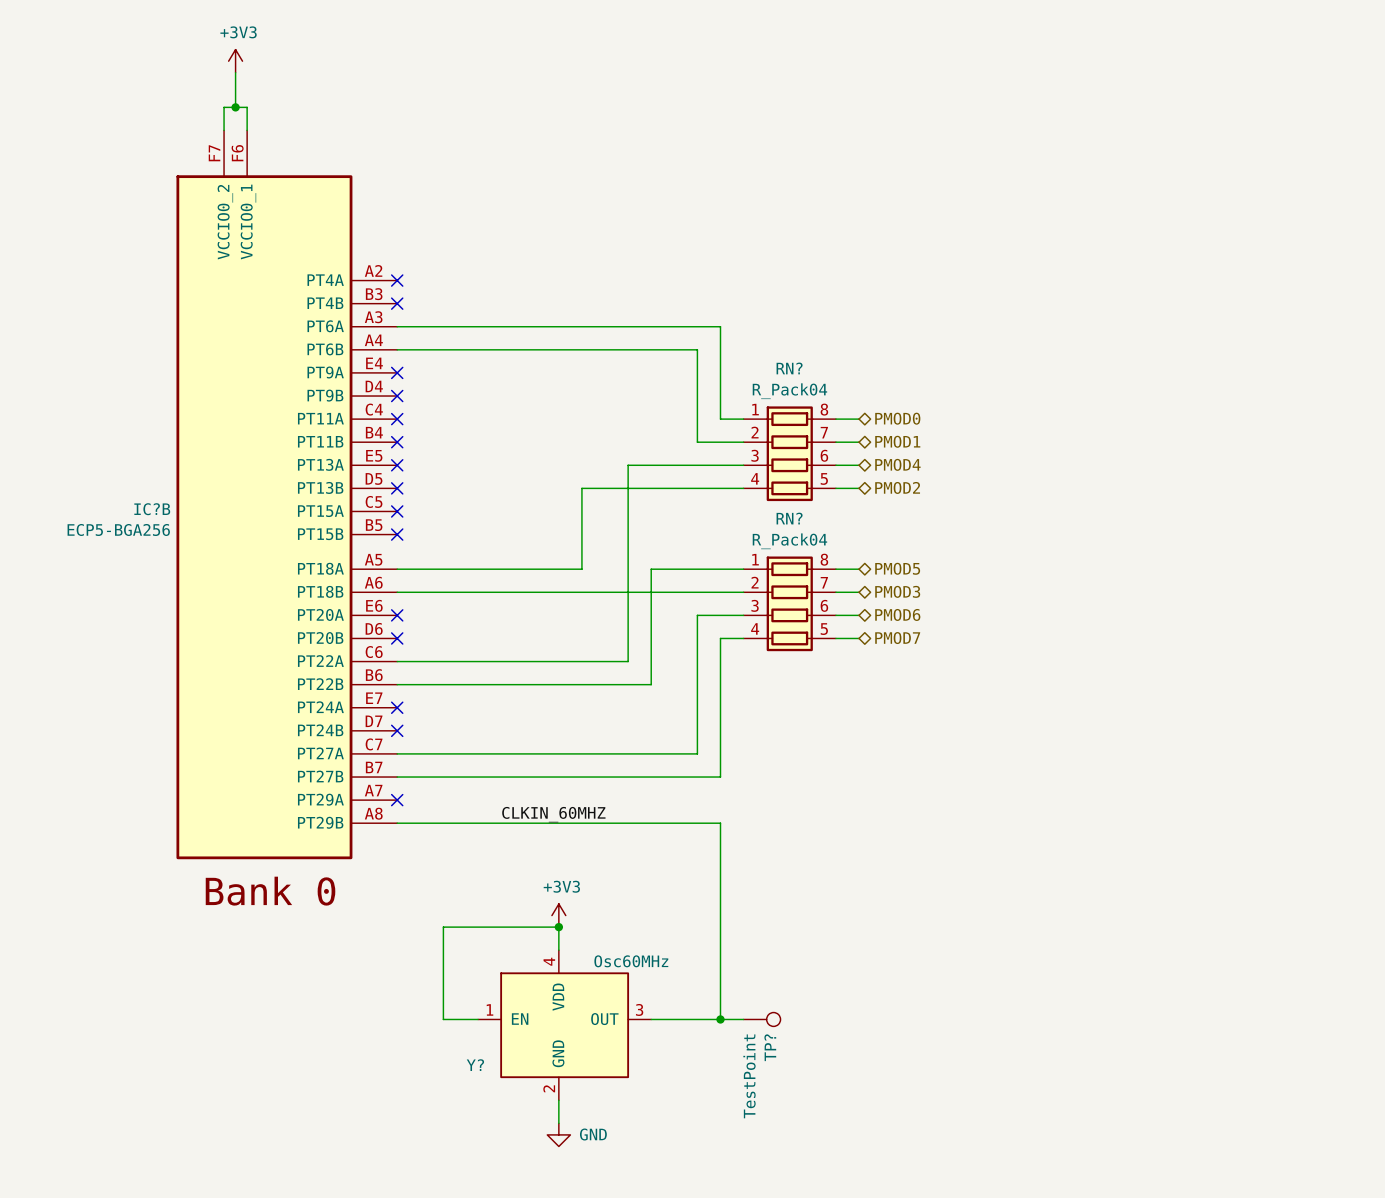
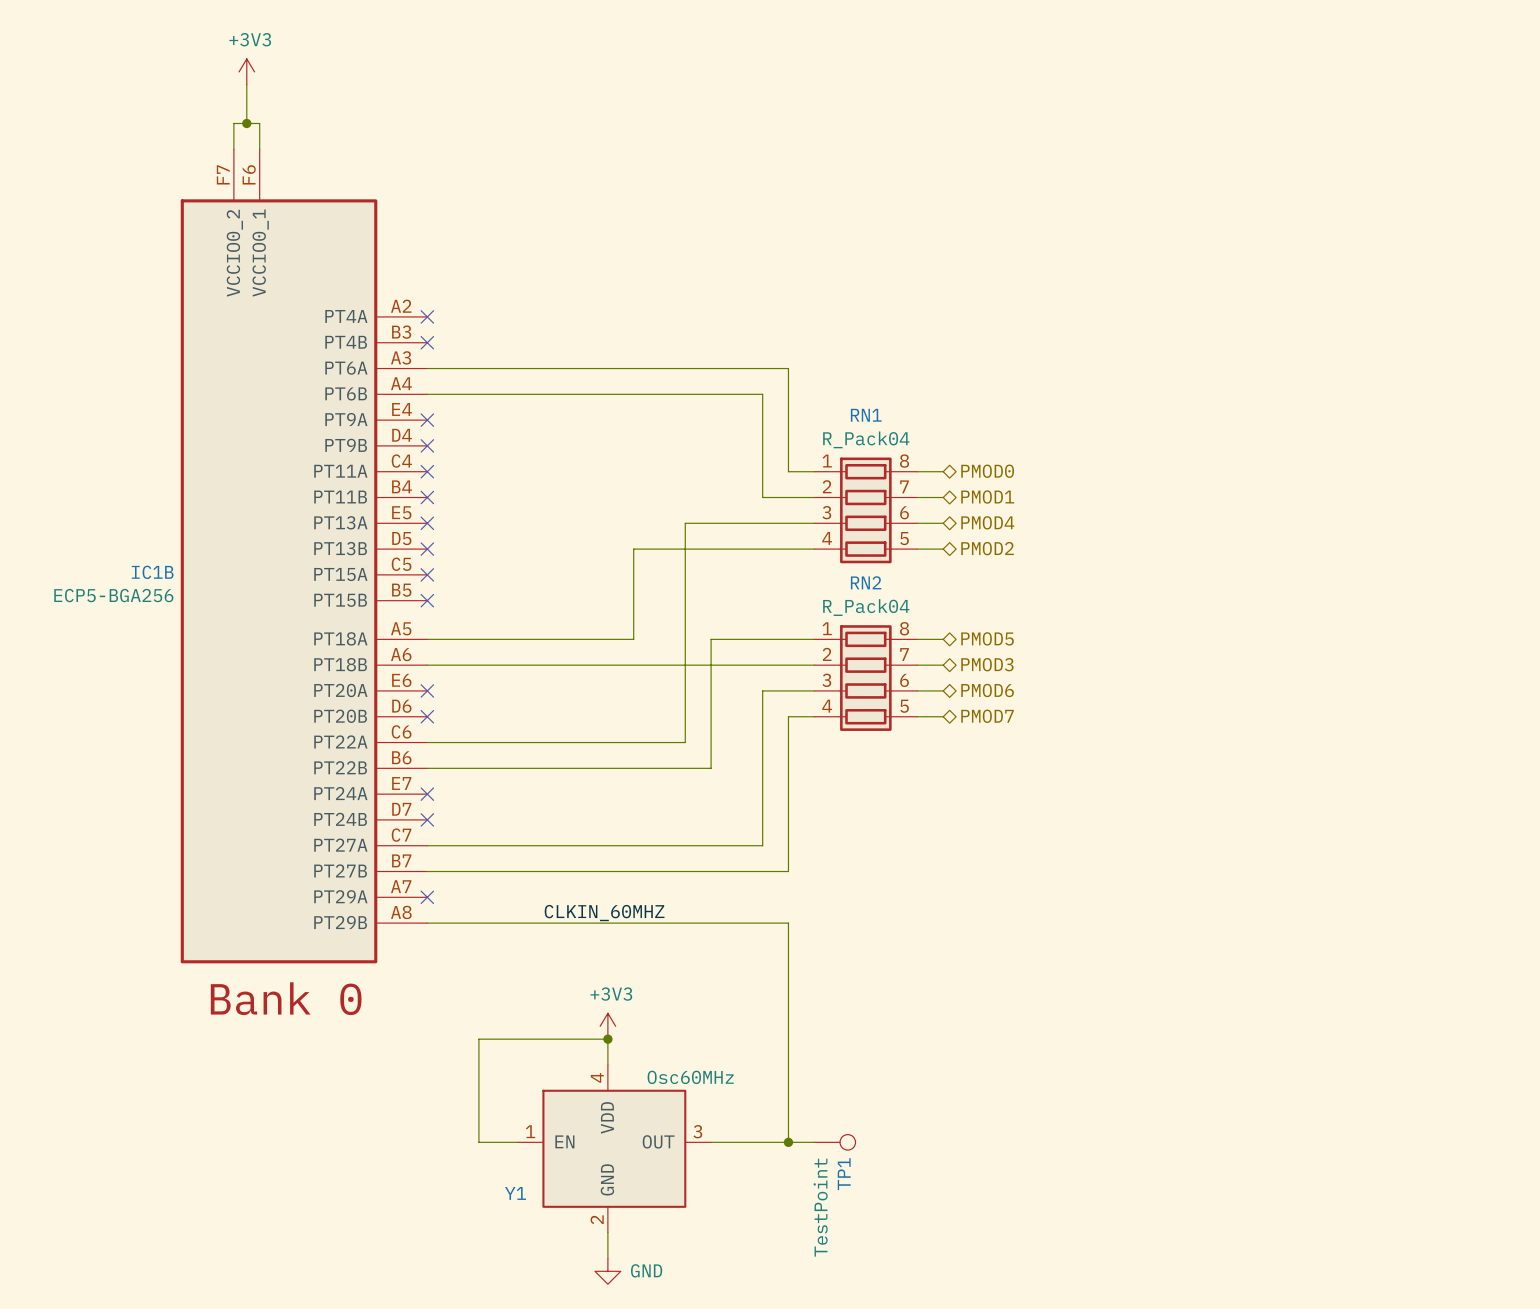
RN? name: RN? (789, 368) -> RN1 (866, 415)
IC?B name: IC?B (152, 509) -> IC1B (152, 572)
RN? name: RN? (789, 518) -> RN2 (866, 582)
TP? name: TP? (770, 1047) -> TP1 (844, 1174)
Y? name: Y? (475, 1065) -> Y1 (515, 1193)

